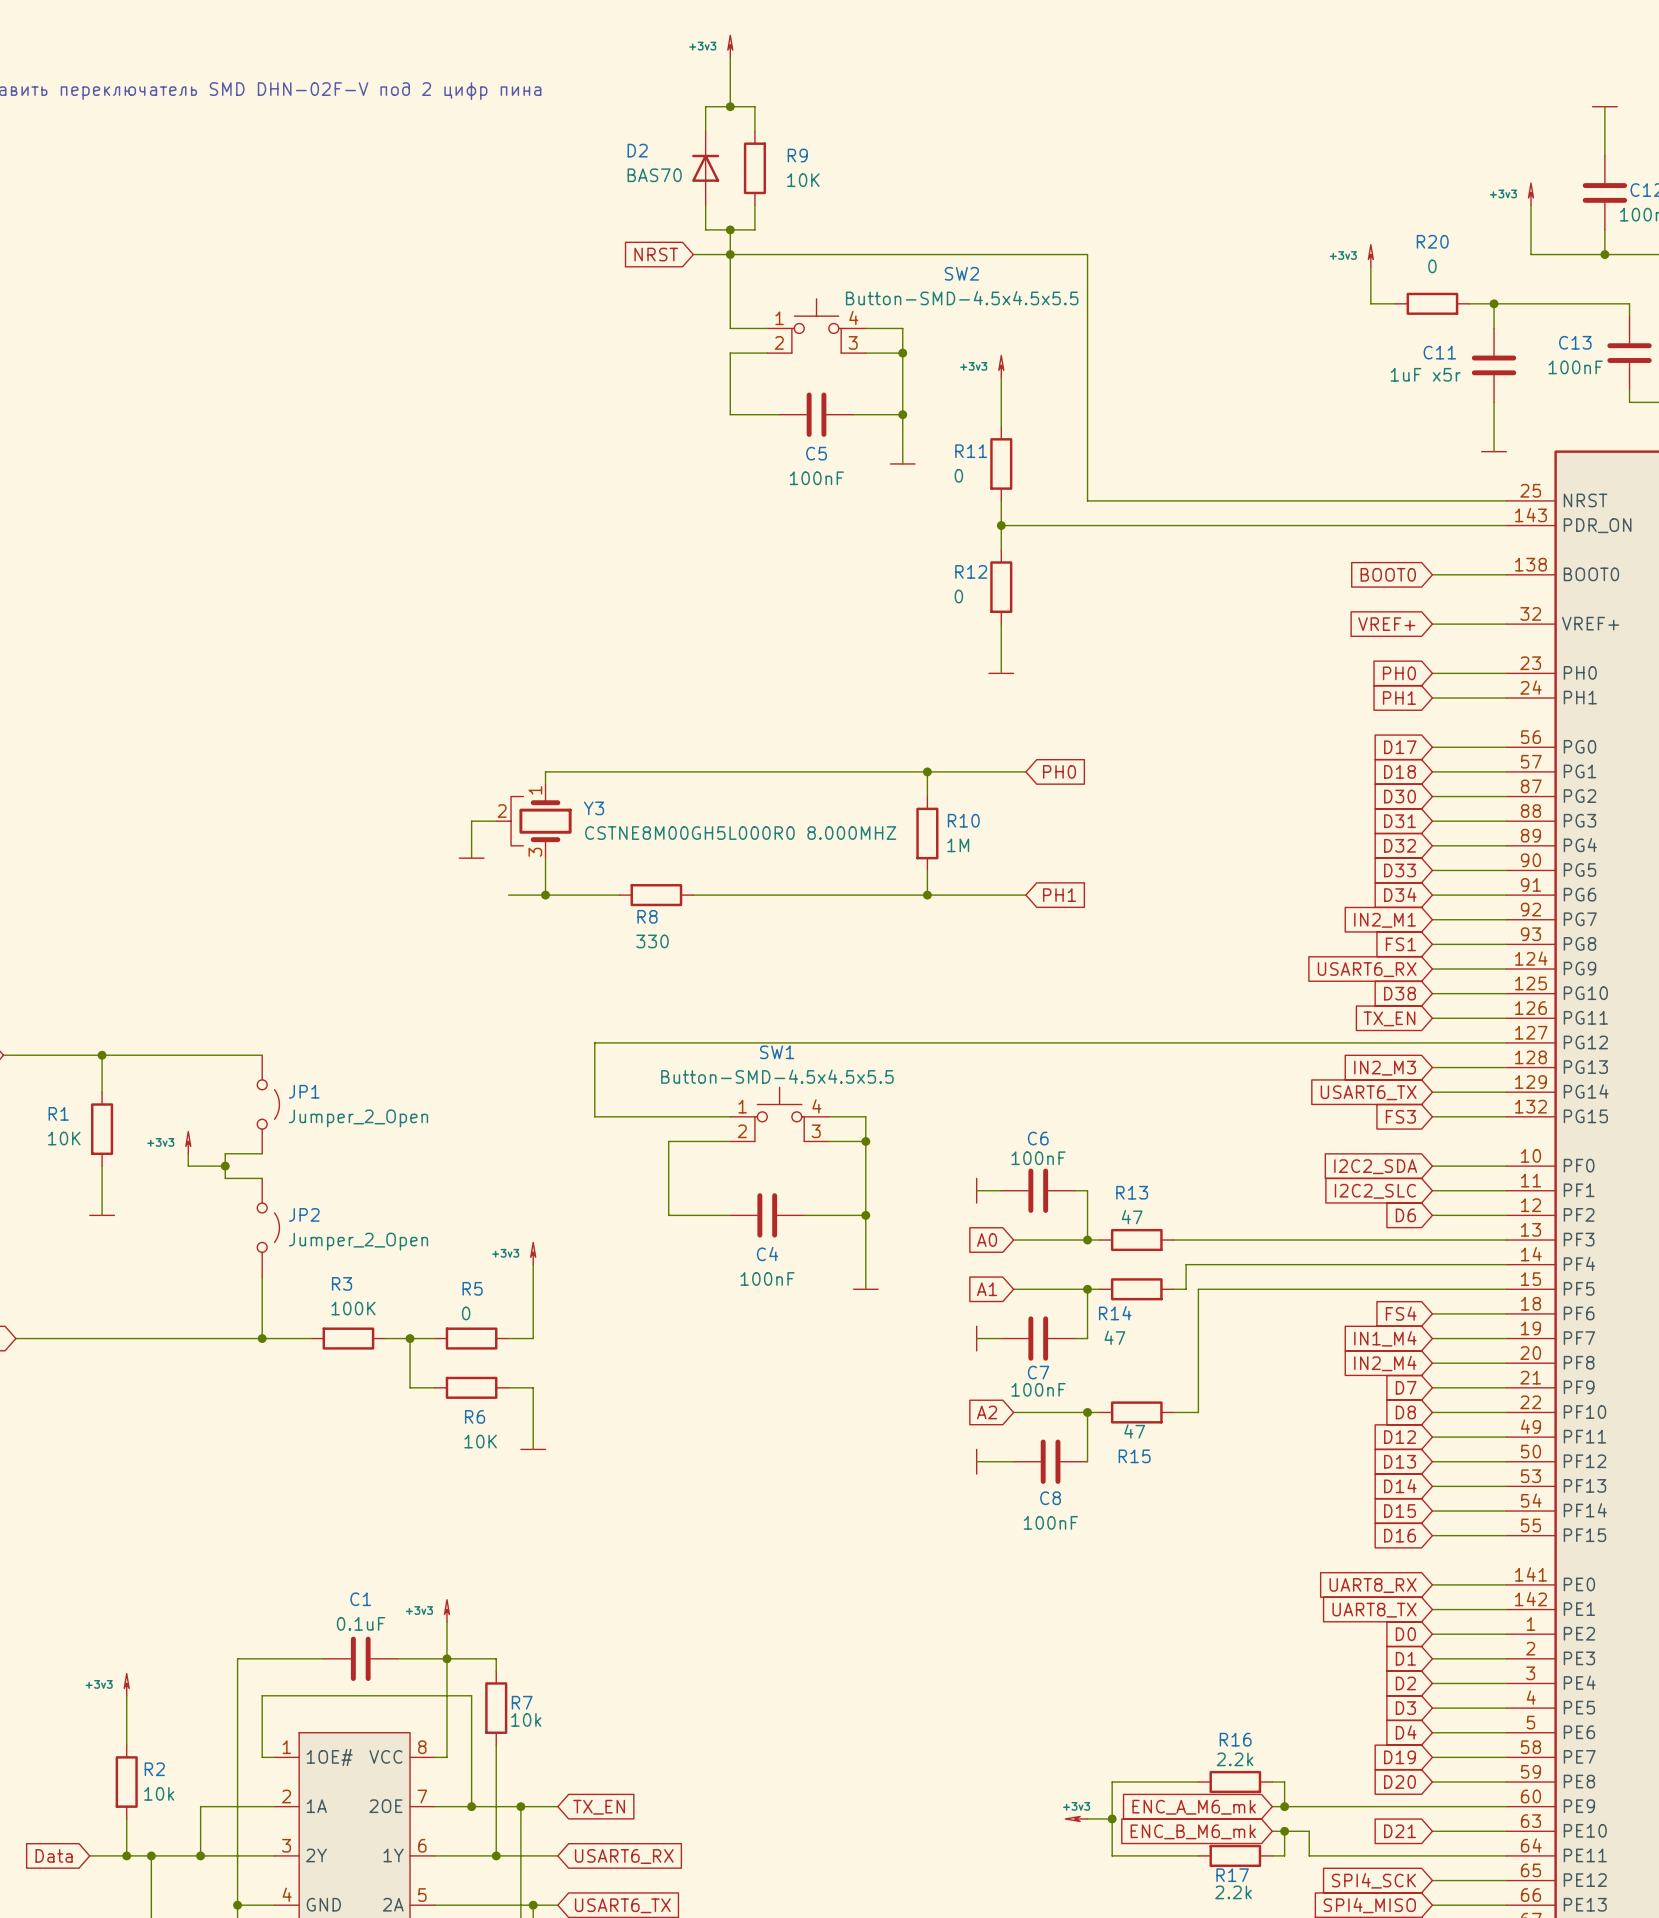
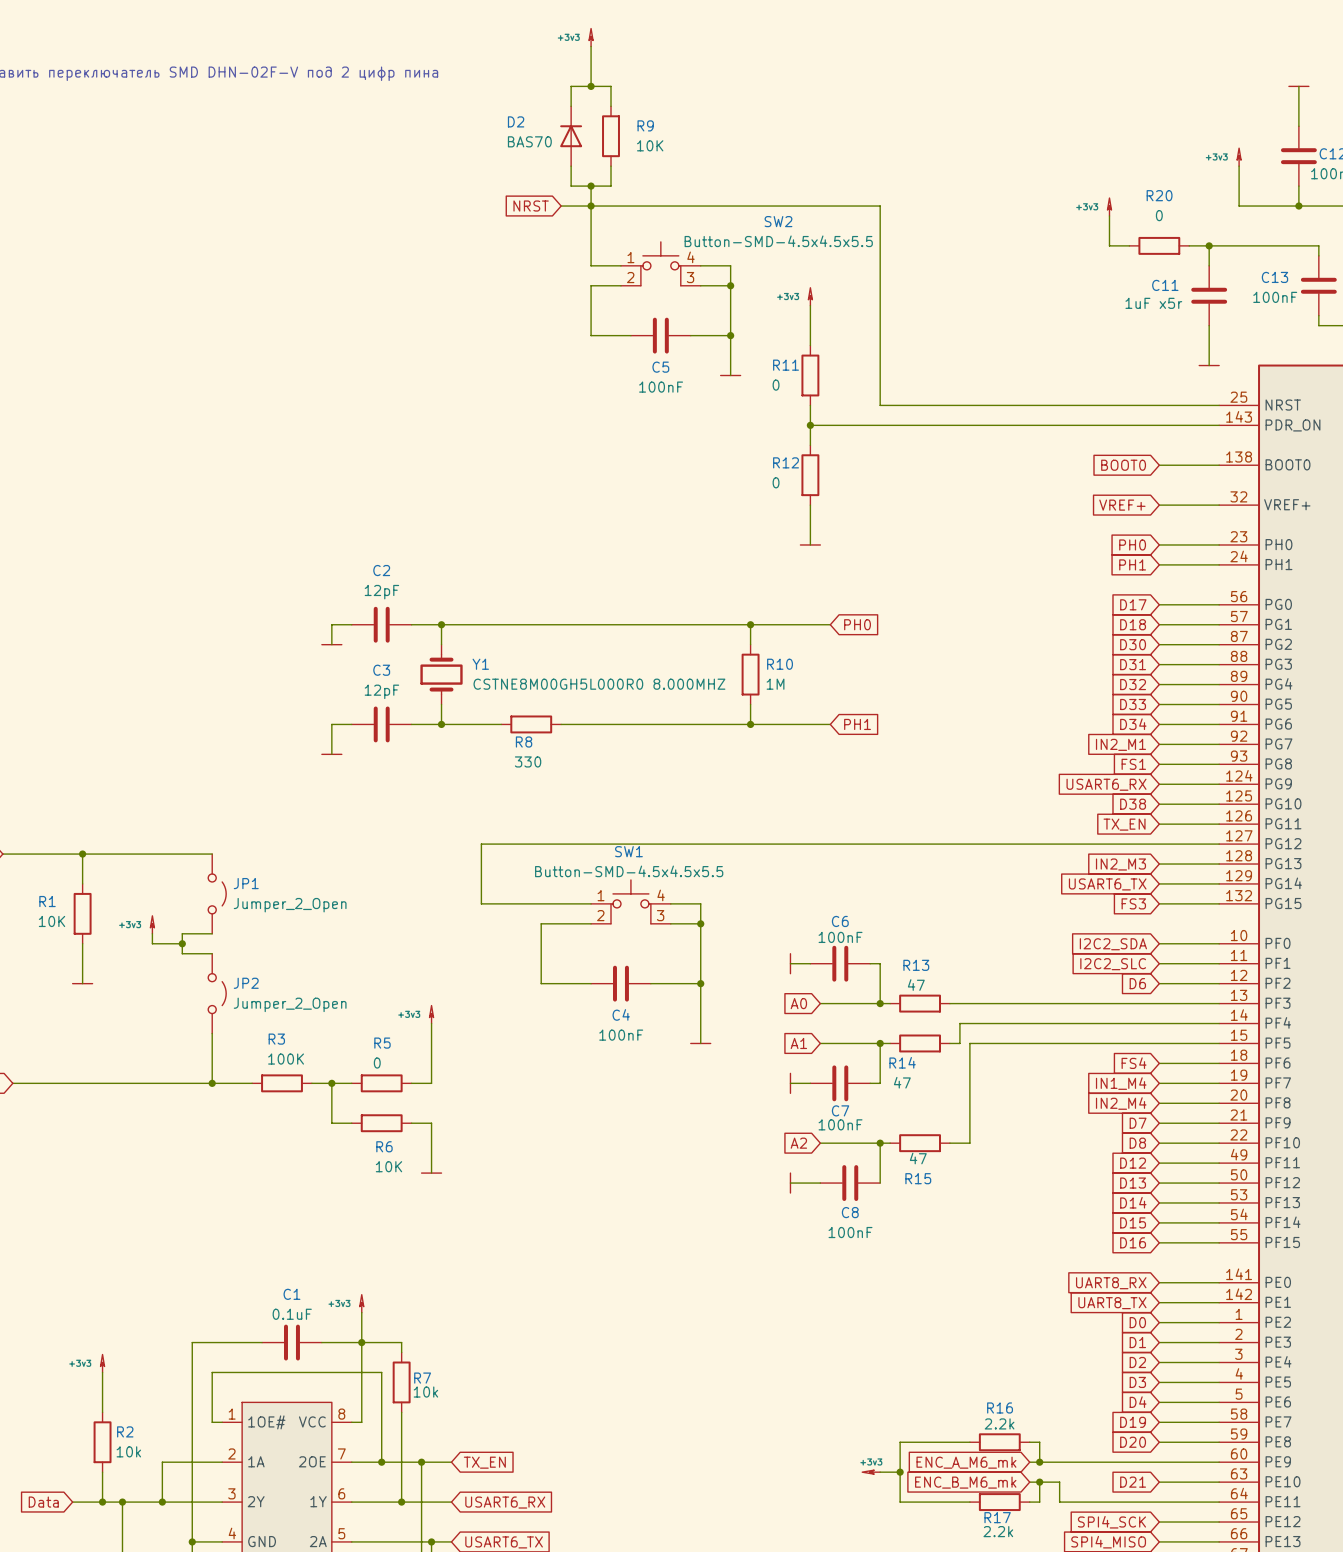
wire: none -> (351, 624) (331, 624) (331, 644)
C2: none -> 12pF (381, 624)
wire: none -> (411, 624) (441, 624)
junction: none -> (441, 624)
power symbol: none -> (331, 644)
wire: (496, 821) (471, 821) (471, 858) -> (351, 724) (331, 724) (331, 754)
Y3: CSTNE8M00GH5L000R0 8.000MHZ (533, 821) -> none
Y1: none -> CSTNE8M00GH5L000R0 8.000MHZ (441, 674)
power symbol: (471, 858) -> none
C3: none -> 12pF (381, 724)
power symbol: none -> (331, 754)

